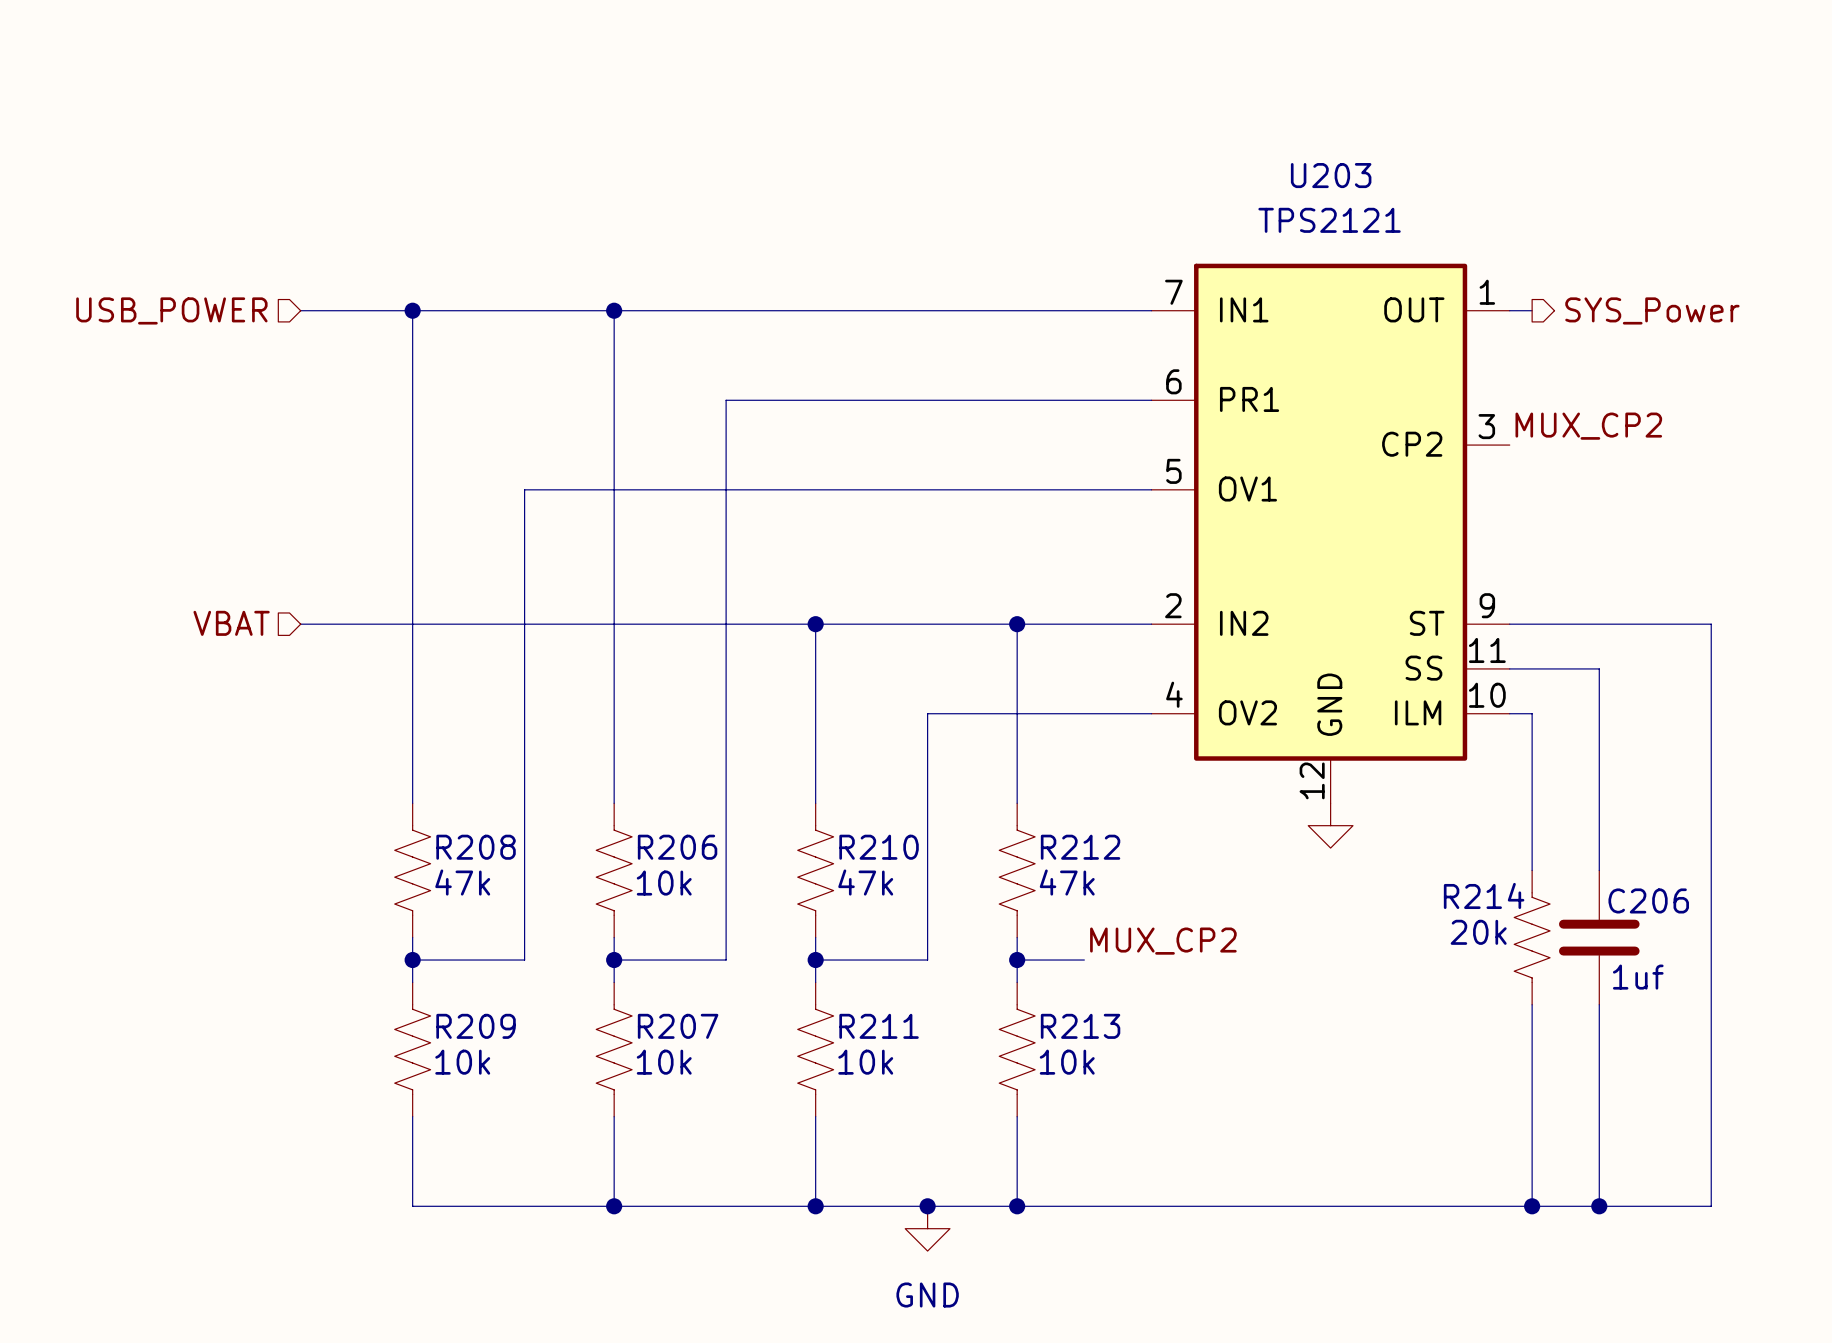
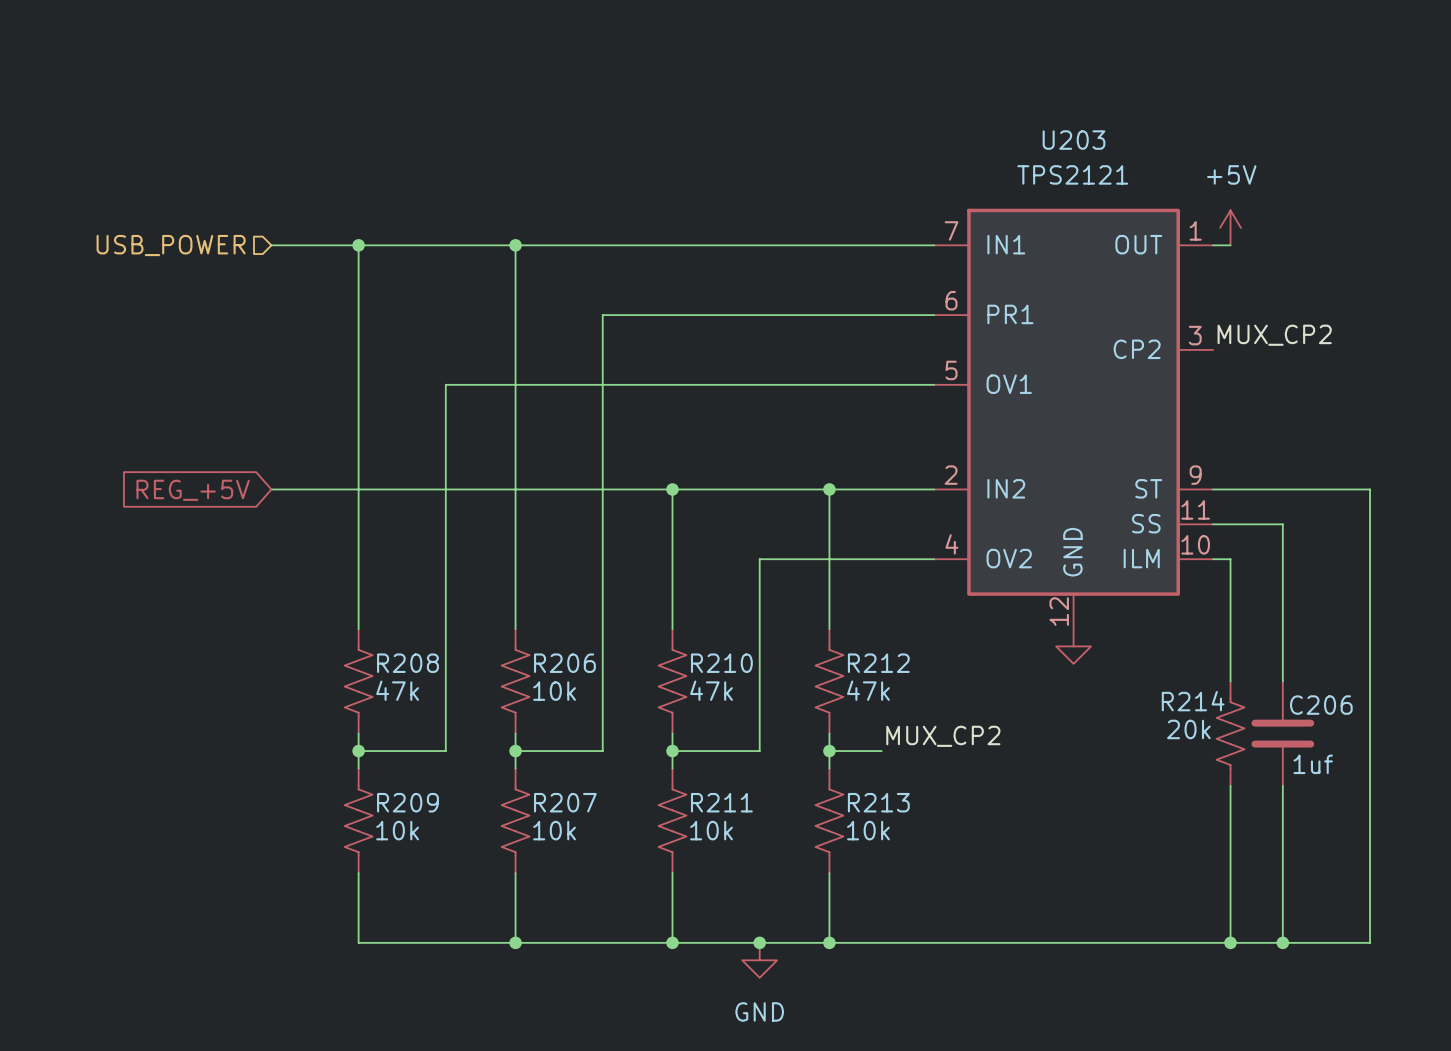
power symbol: none -> +5V (1230, 227)
hierarchical label: SYS_Power (1652, 310) -> none
hierarchical label: VBAT (231, 623) -> none
global label: none -> REG_+5V (193, 490)

